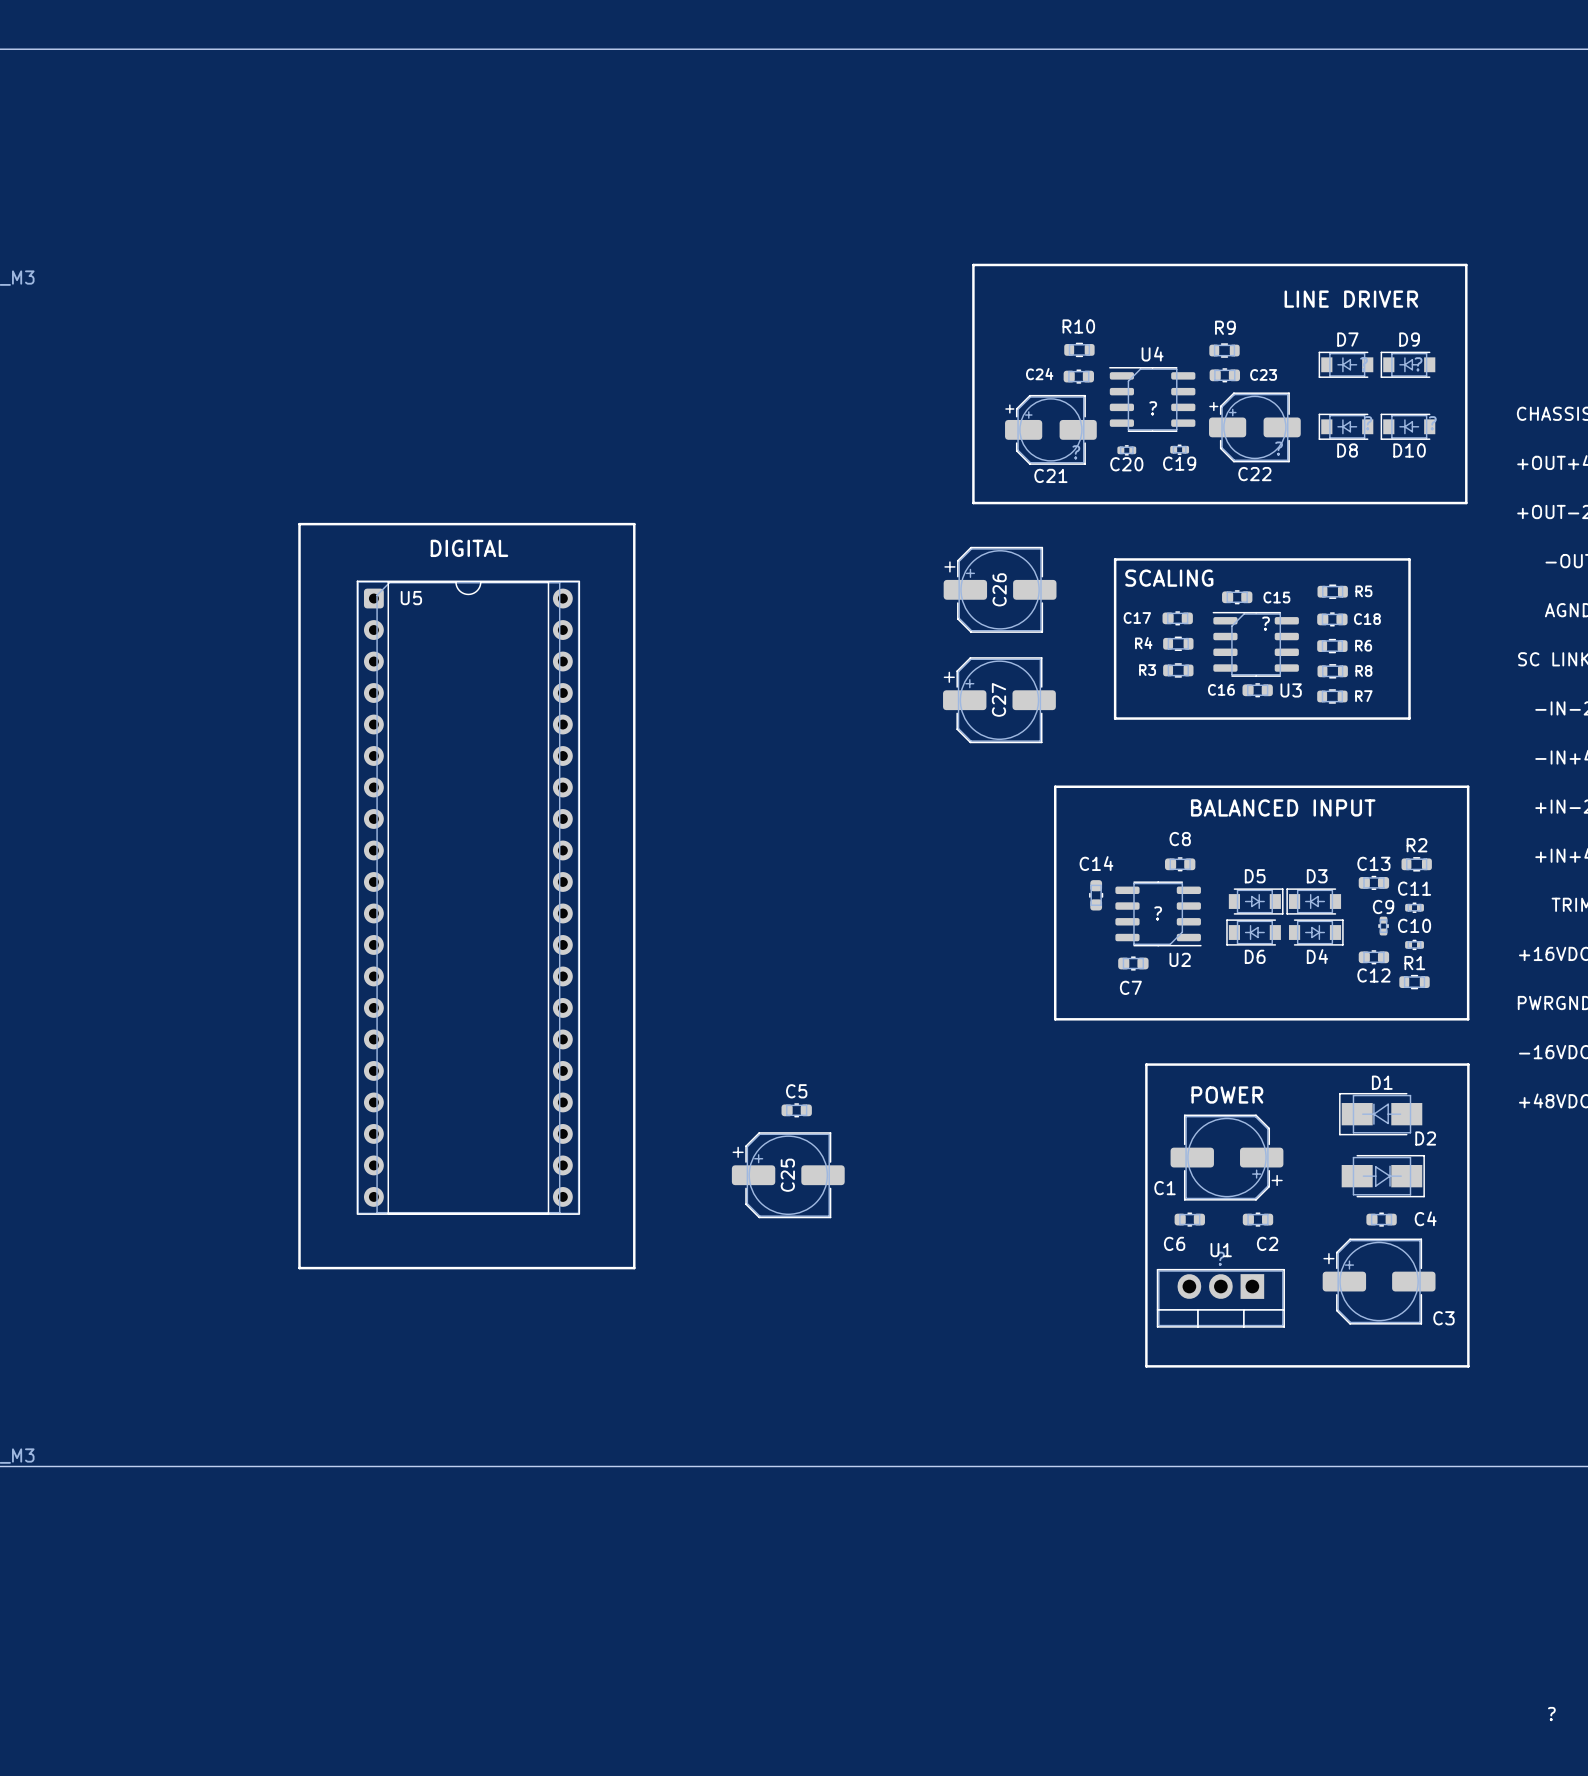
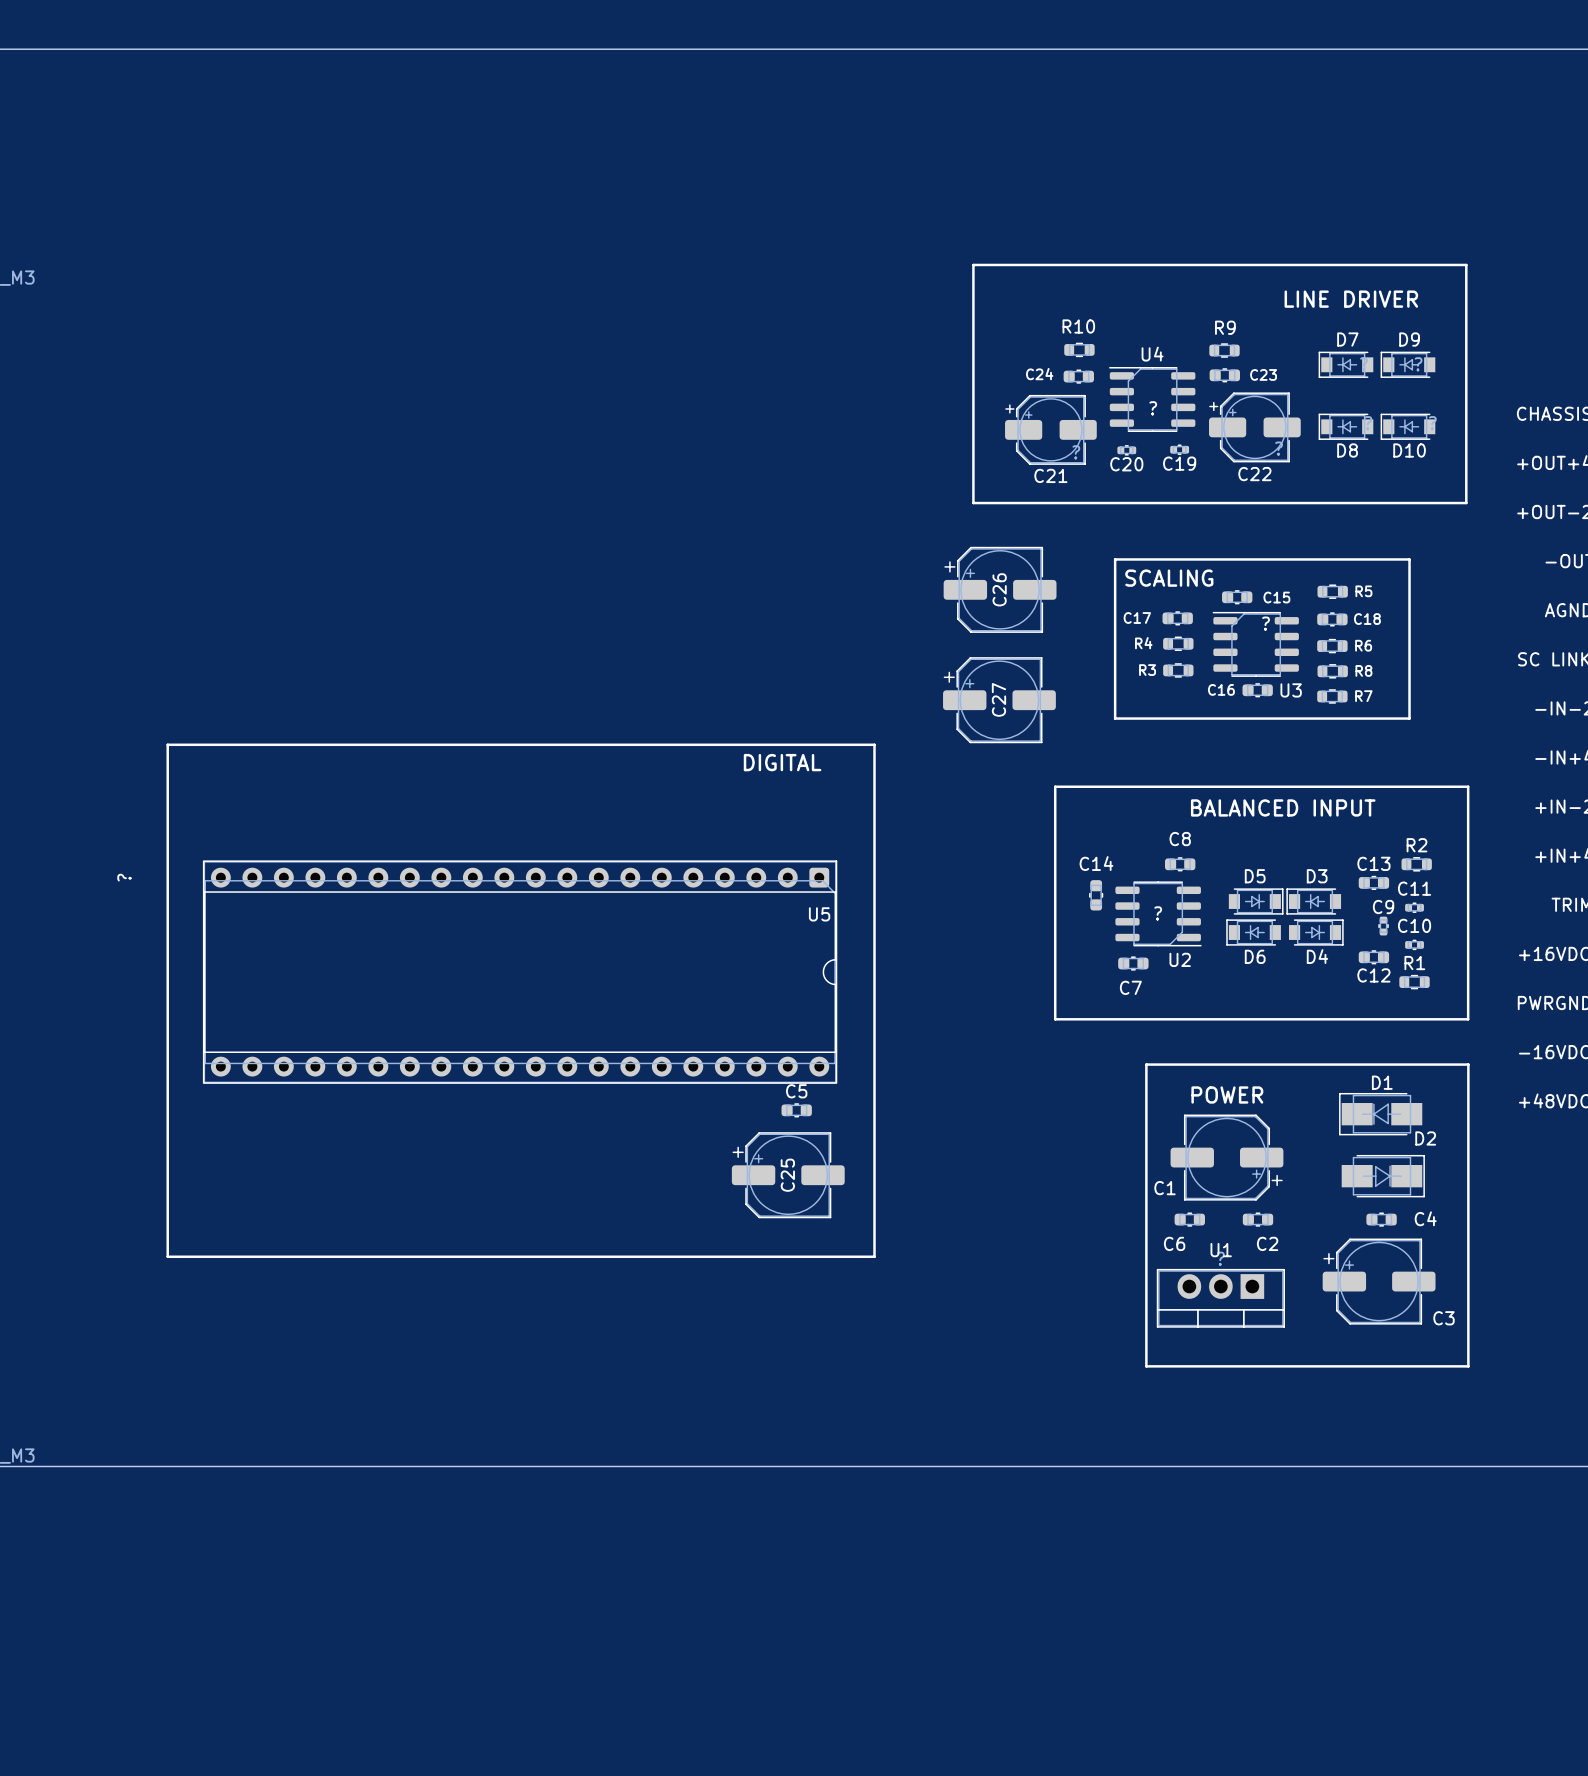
line: (299, 524) (634, 524) (634, 1268) (299, 1268) (299, 524) -> none
text: DIGITAL (469, 548) -> none
line: none -> (167, 744) (874, 744) (874, 1256) (167, 1256) (167, 744)
text: none -> DIGITAL (782, 762)
U5 rotation: 0° (468, 897) -> 90° clockwise (520, 972)
U5 value position: ? (1551, 1714) -> ? (124, 877)

